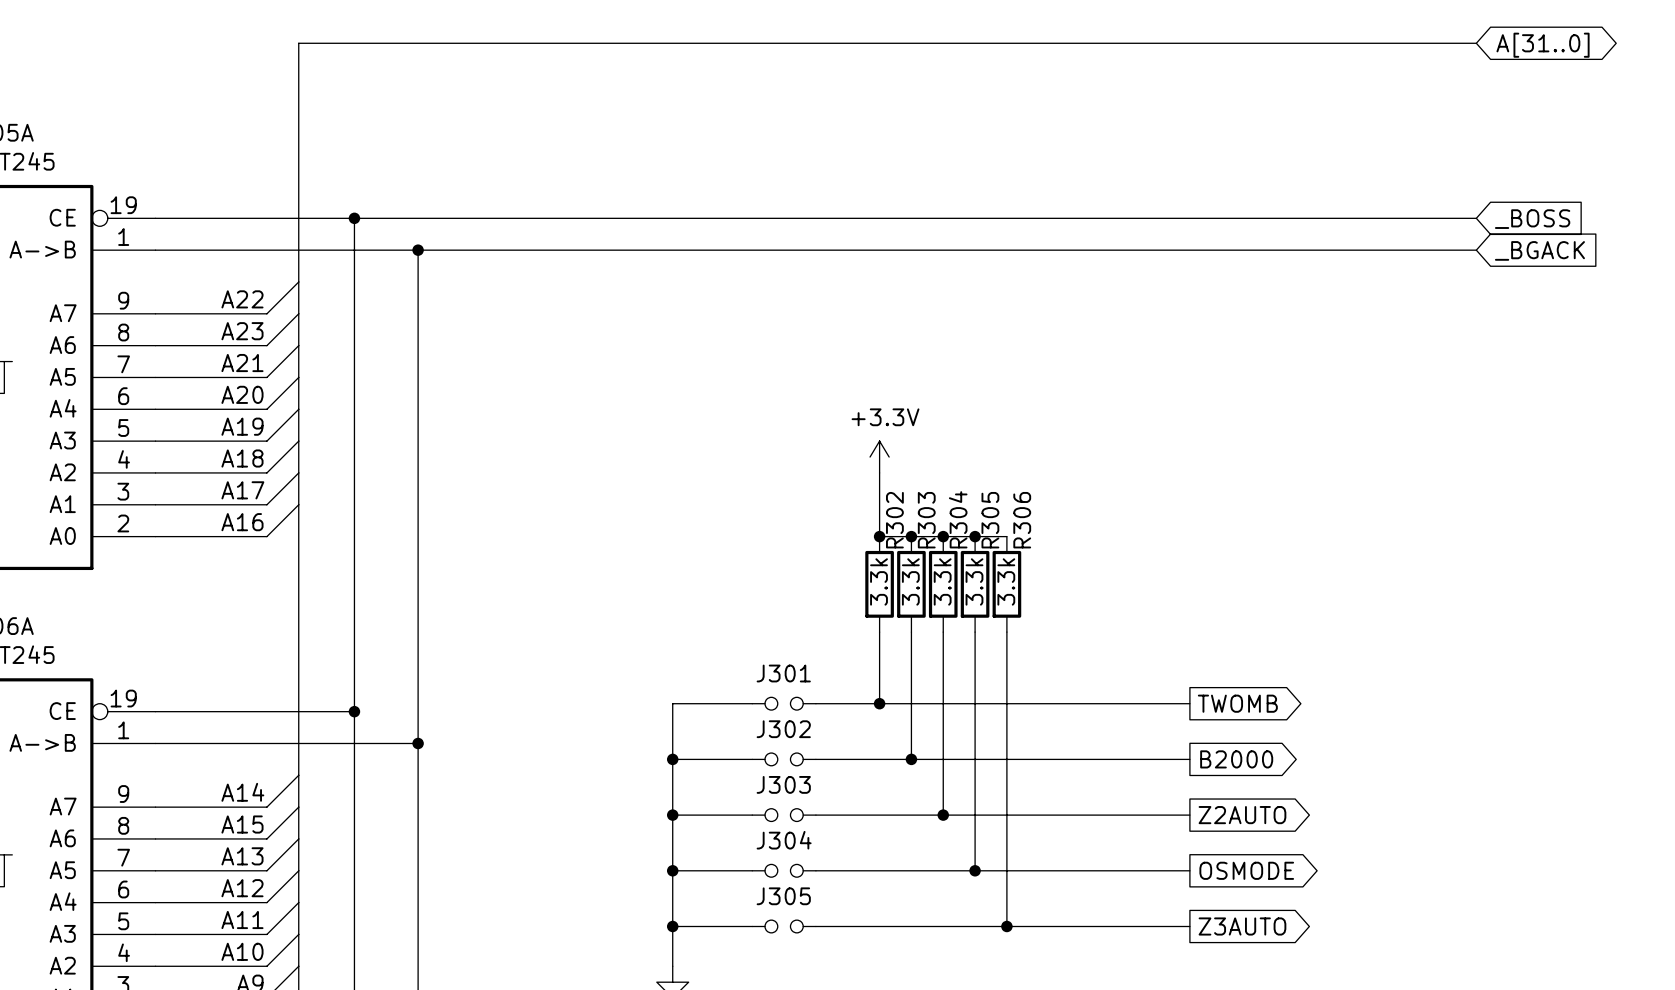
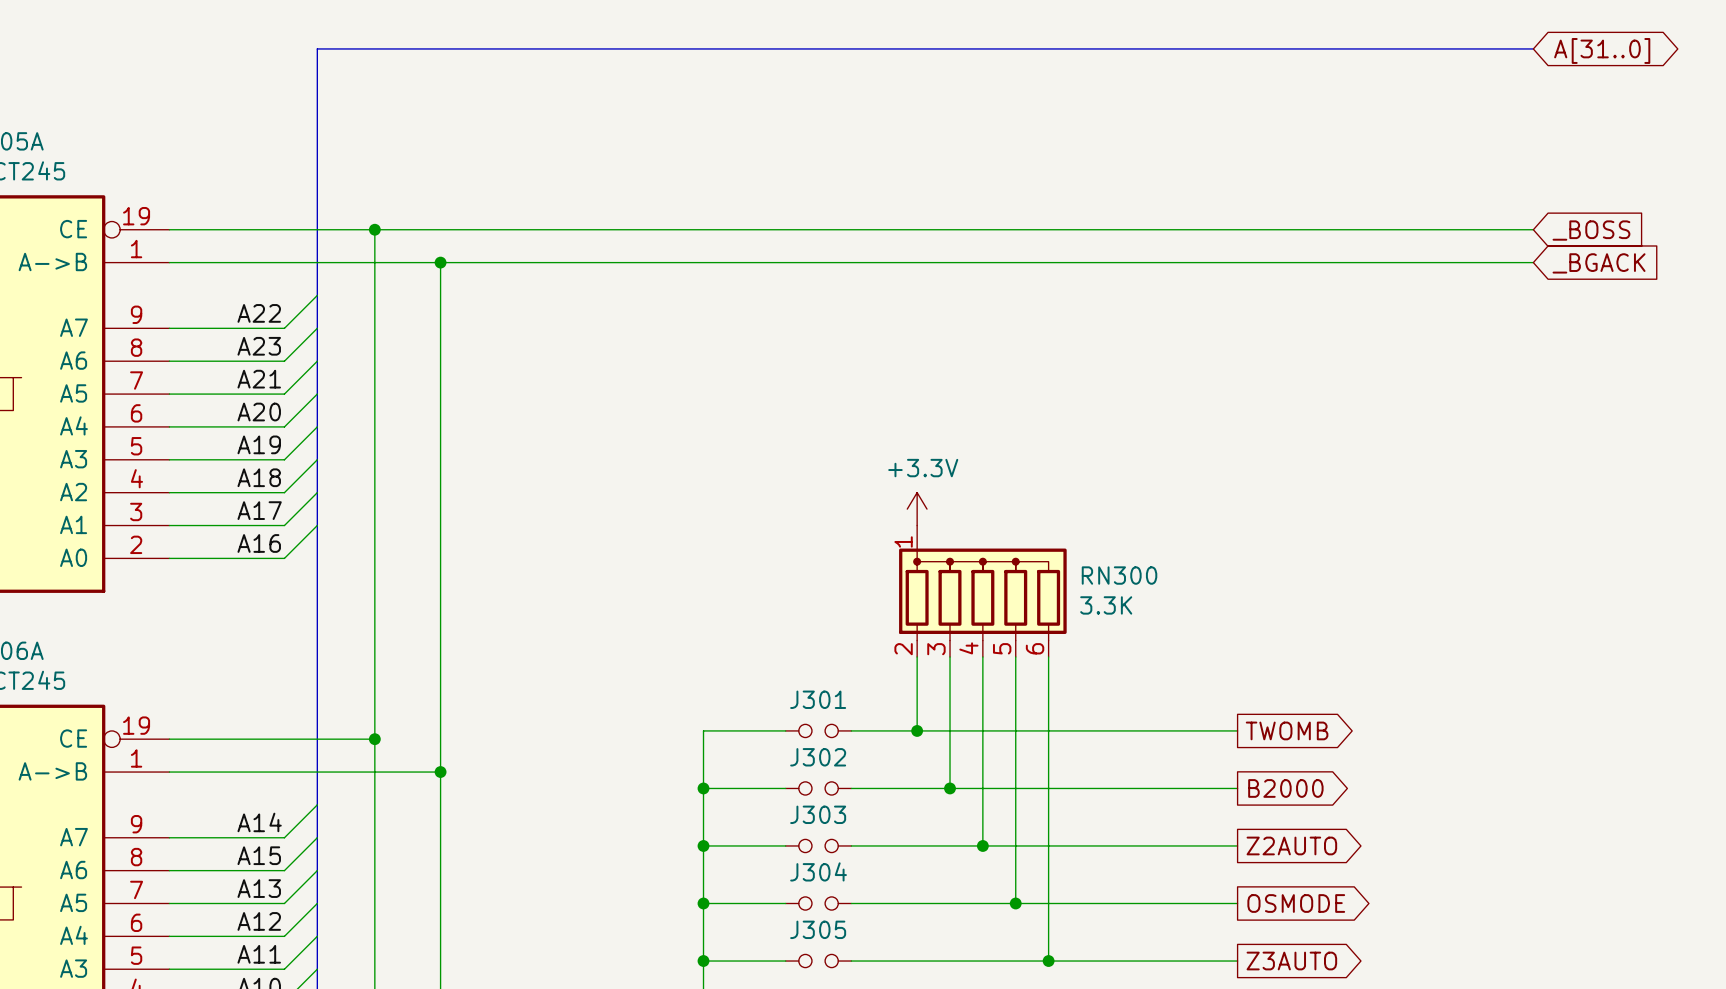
power symbol position: +3.3V (879, 457) -> +3.3V (917, 509)
junction: (879, 536) -> none
junction: (911, 536) -> none
junction: (943, 536) -> none
junction: (975, 536) -> none
RN300: none -> 3.3K (982, 591)
R302: 3.3k (879, 584) -> none
R303: 3.3k (911, 584) -> none
R304: 3.3k (943, 584) -> none
R305: 3.3k (975, 584) -> none
R306: 3.3k (1006, 584) -> none

